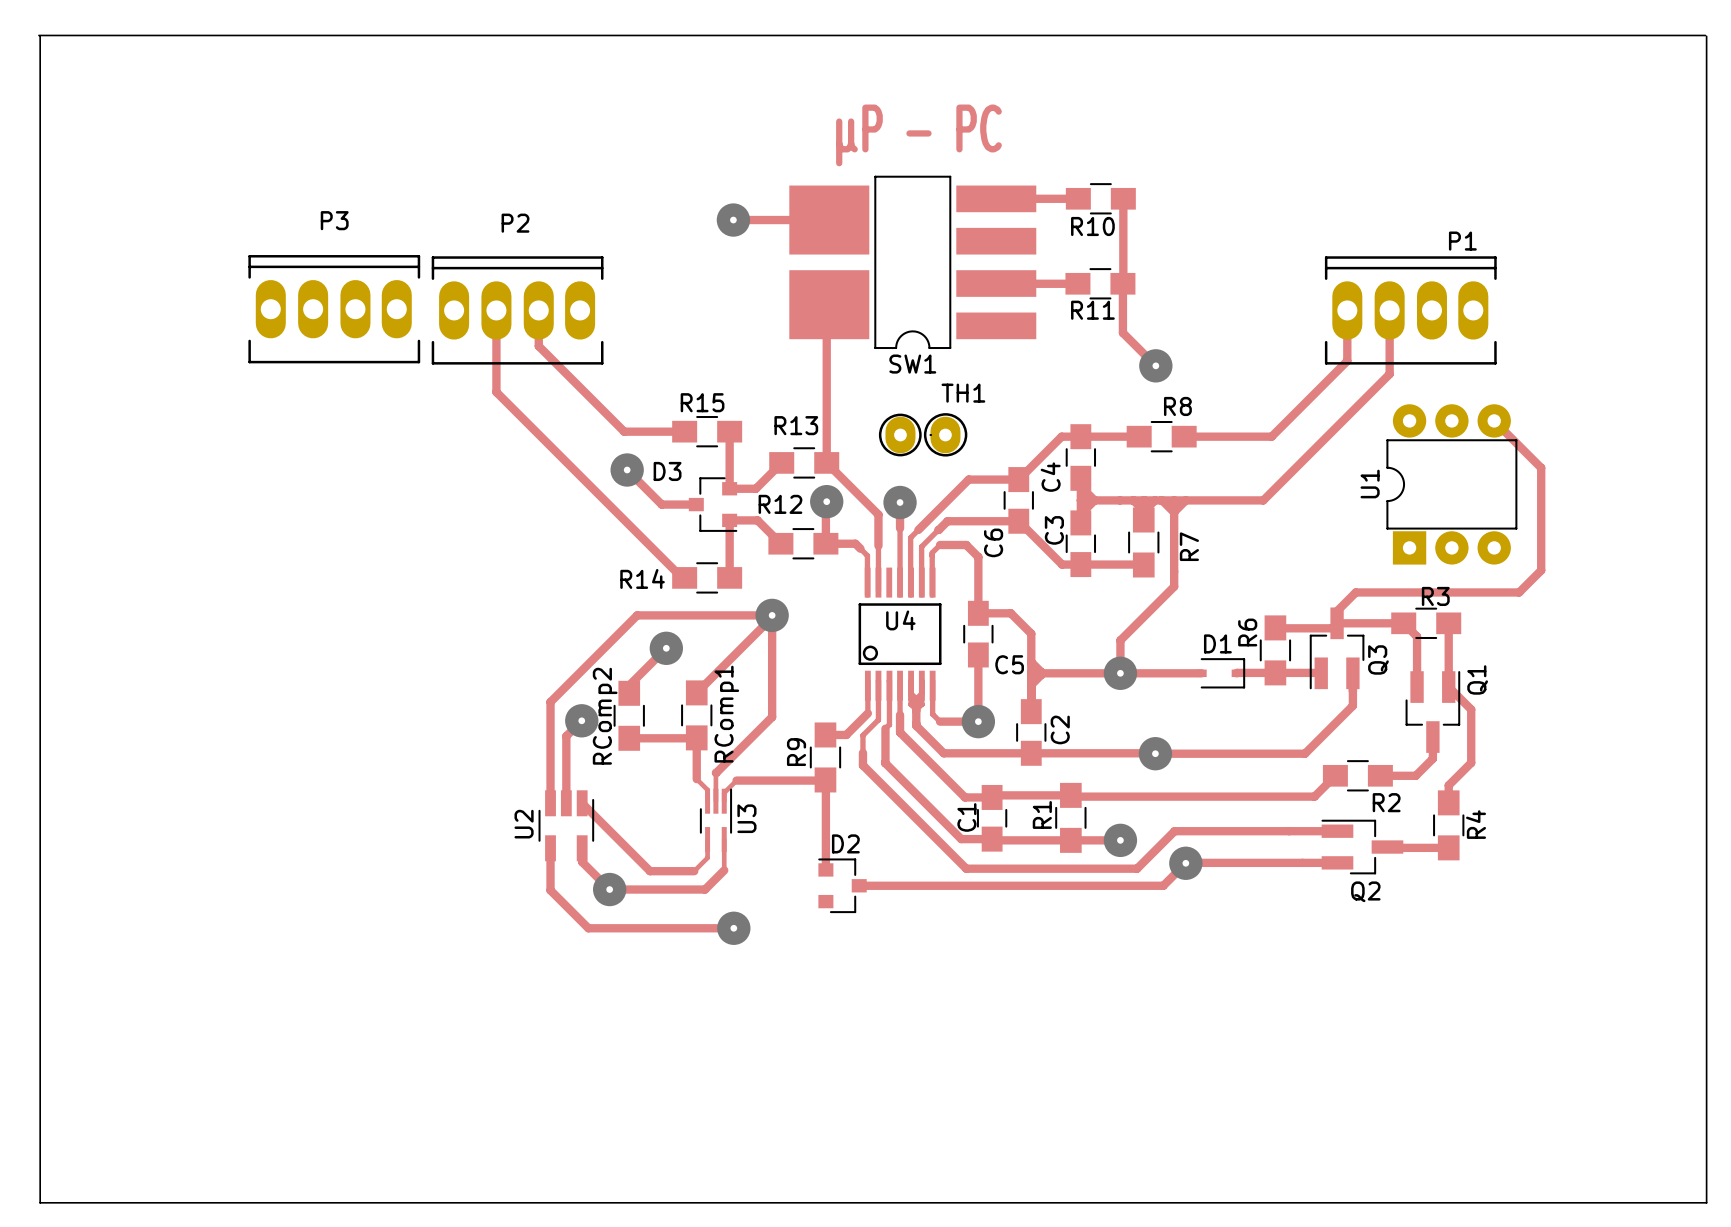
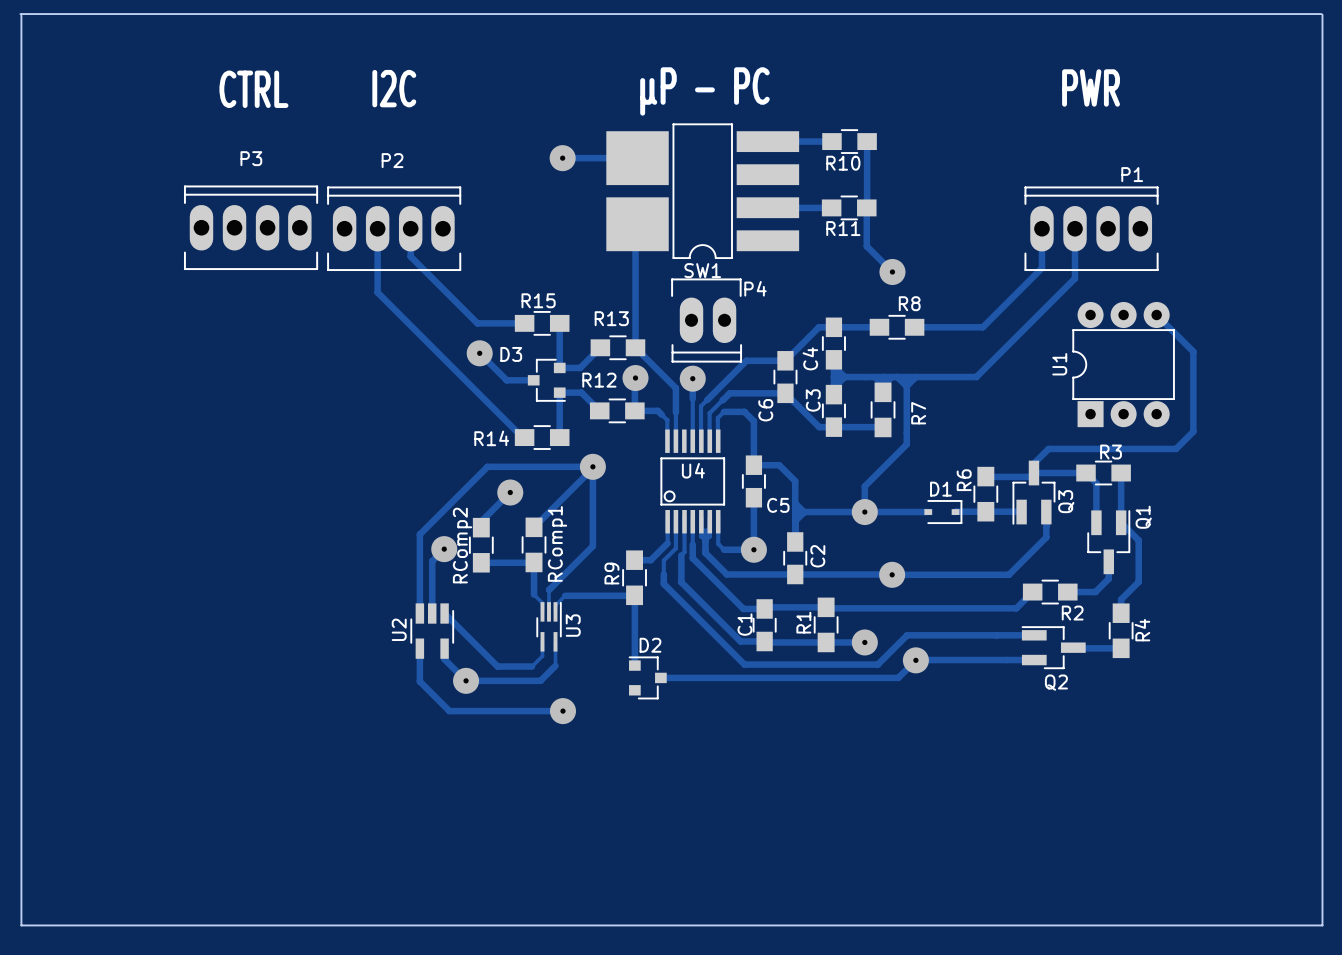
text: none -> I2C (394, 88)
text: none -> PWR (1091, 87)
text: none -> CTRL (253, 89)
text: none -> µP - PC (704, 91)
text: µP - PC (918, 135) -> none
P4: none -> (706, 320)
TH1: (923, 434) -> none

